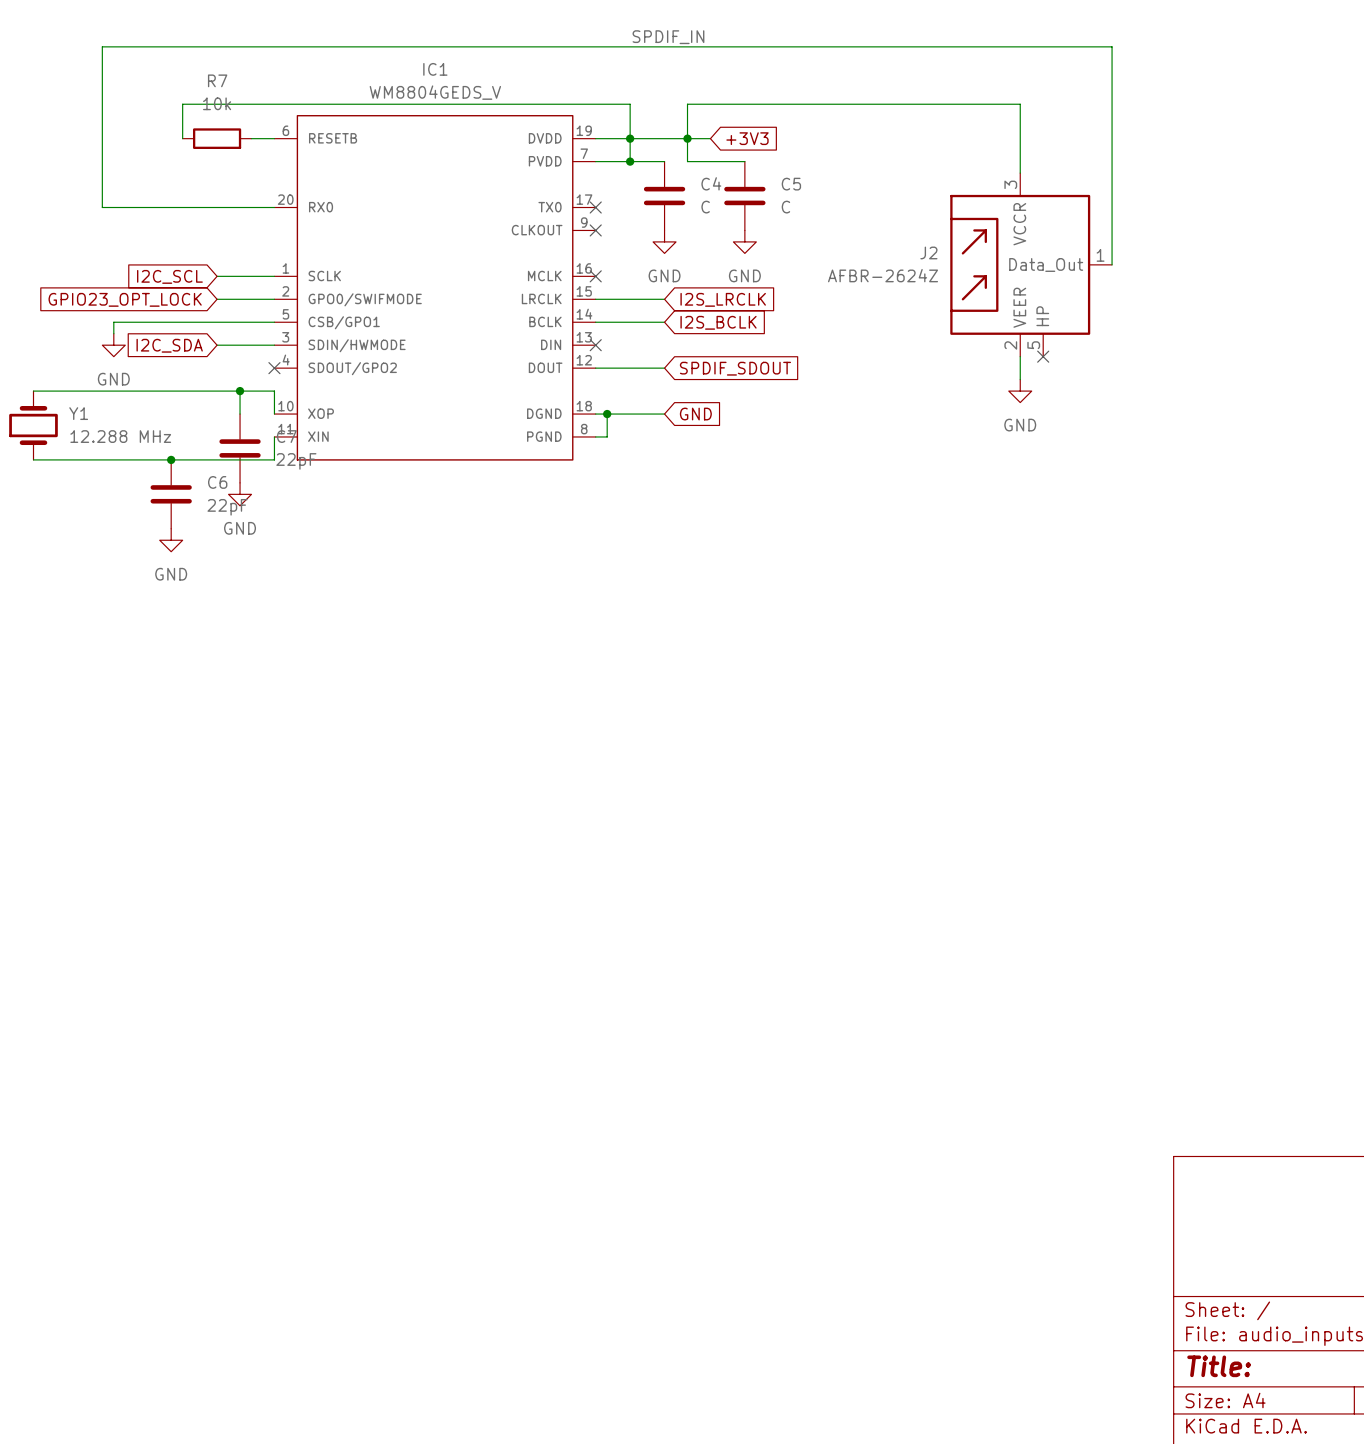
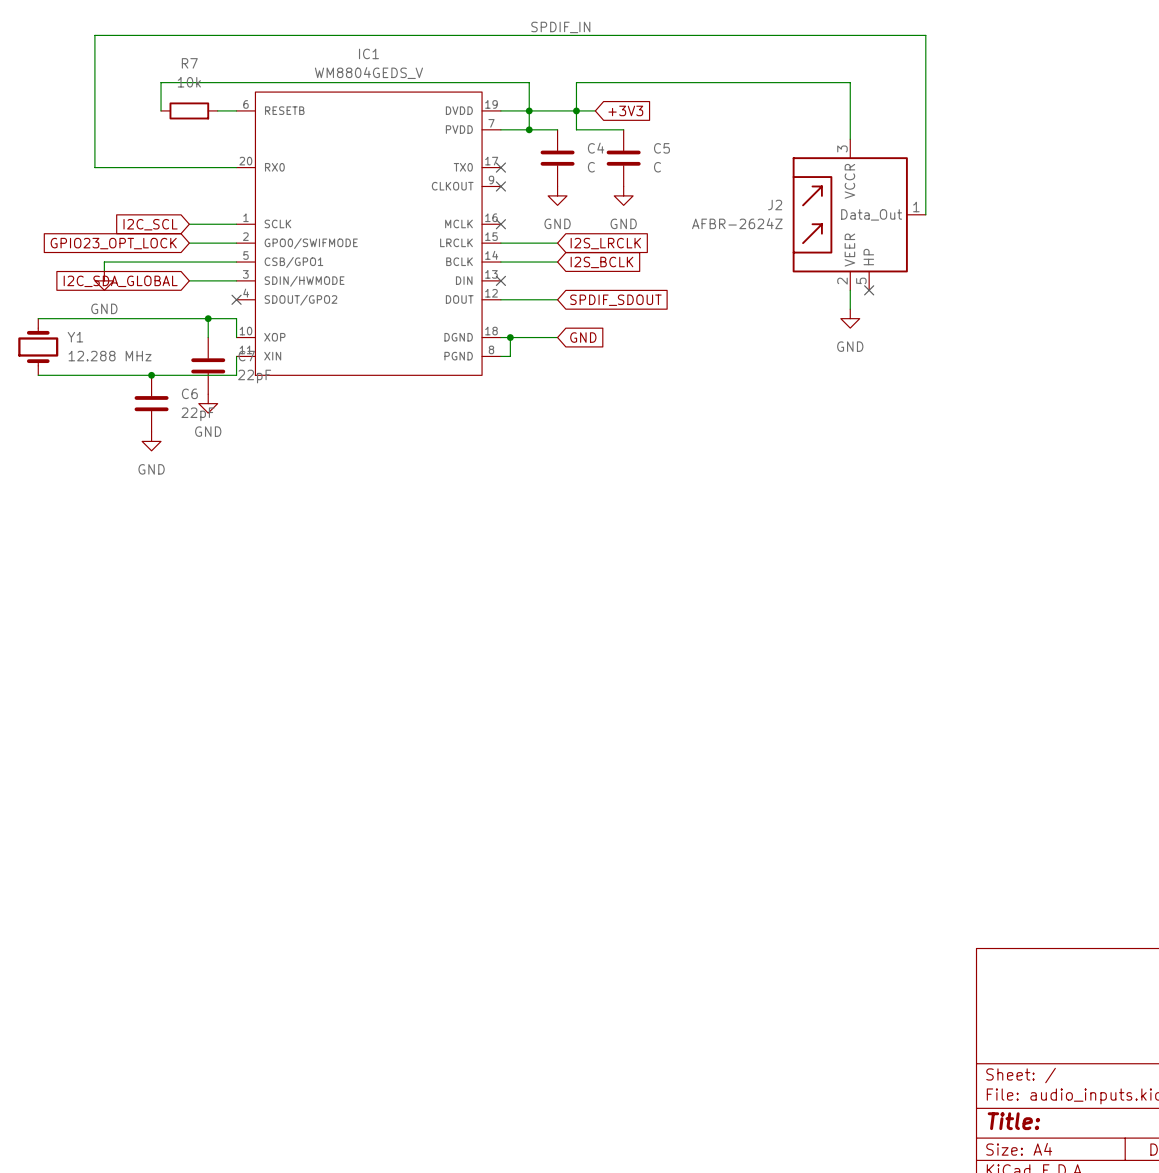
global label: I2C_SDA (169, 345) -> I2C_SDA_GLOBAL (120, 281)

